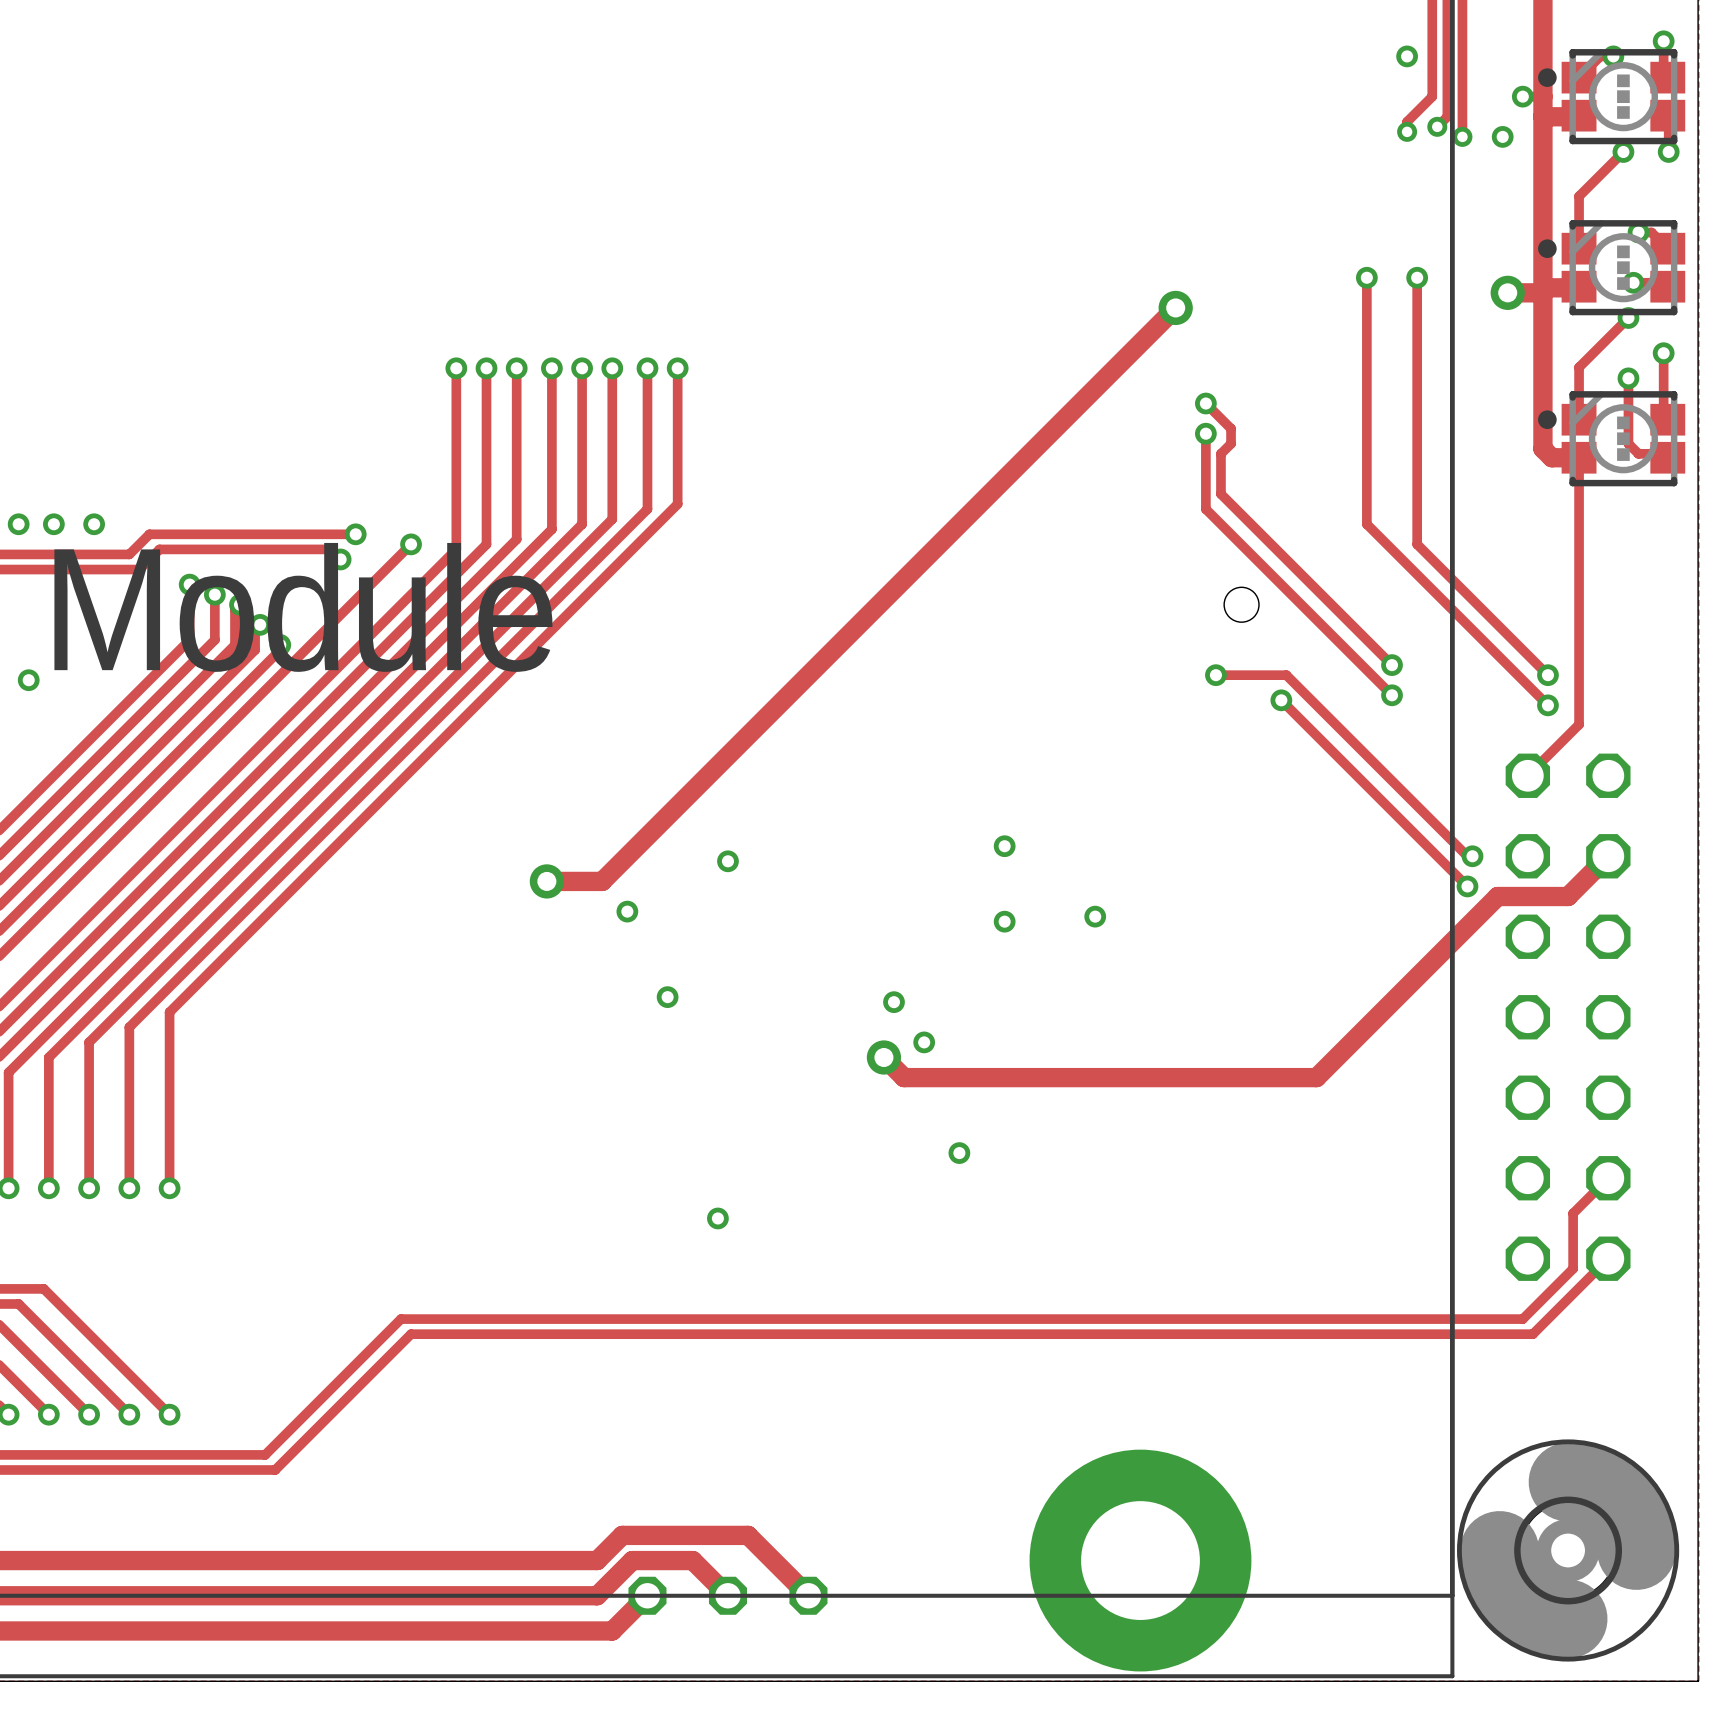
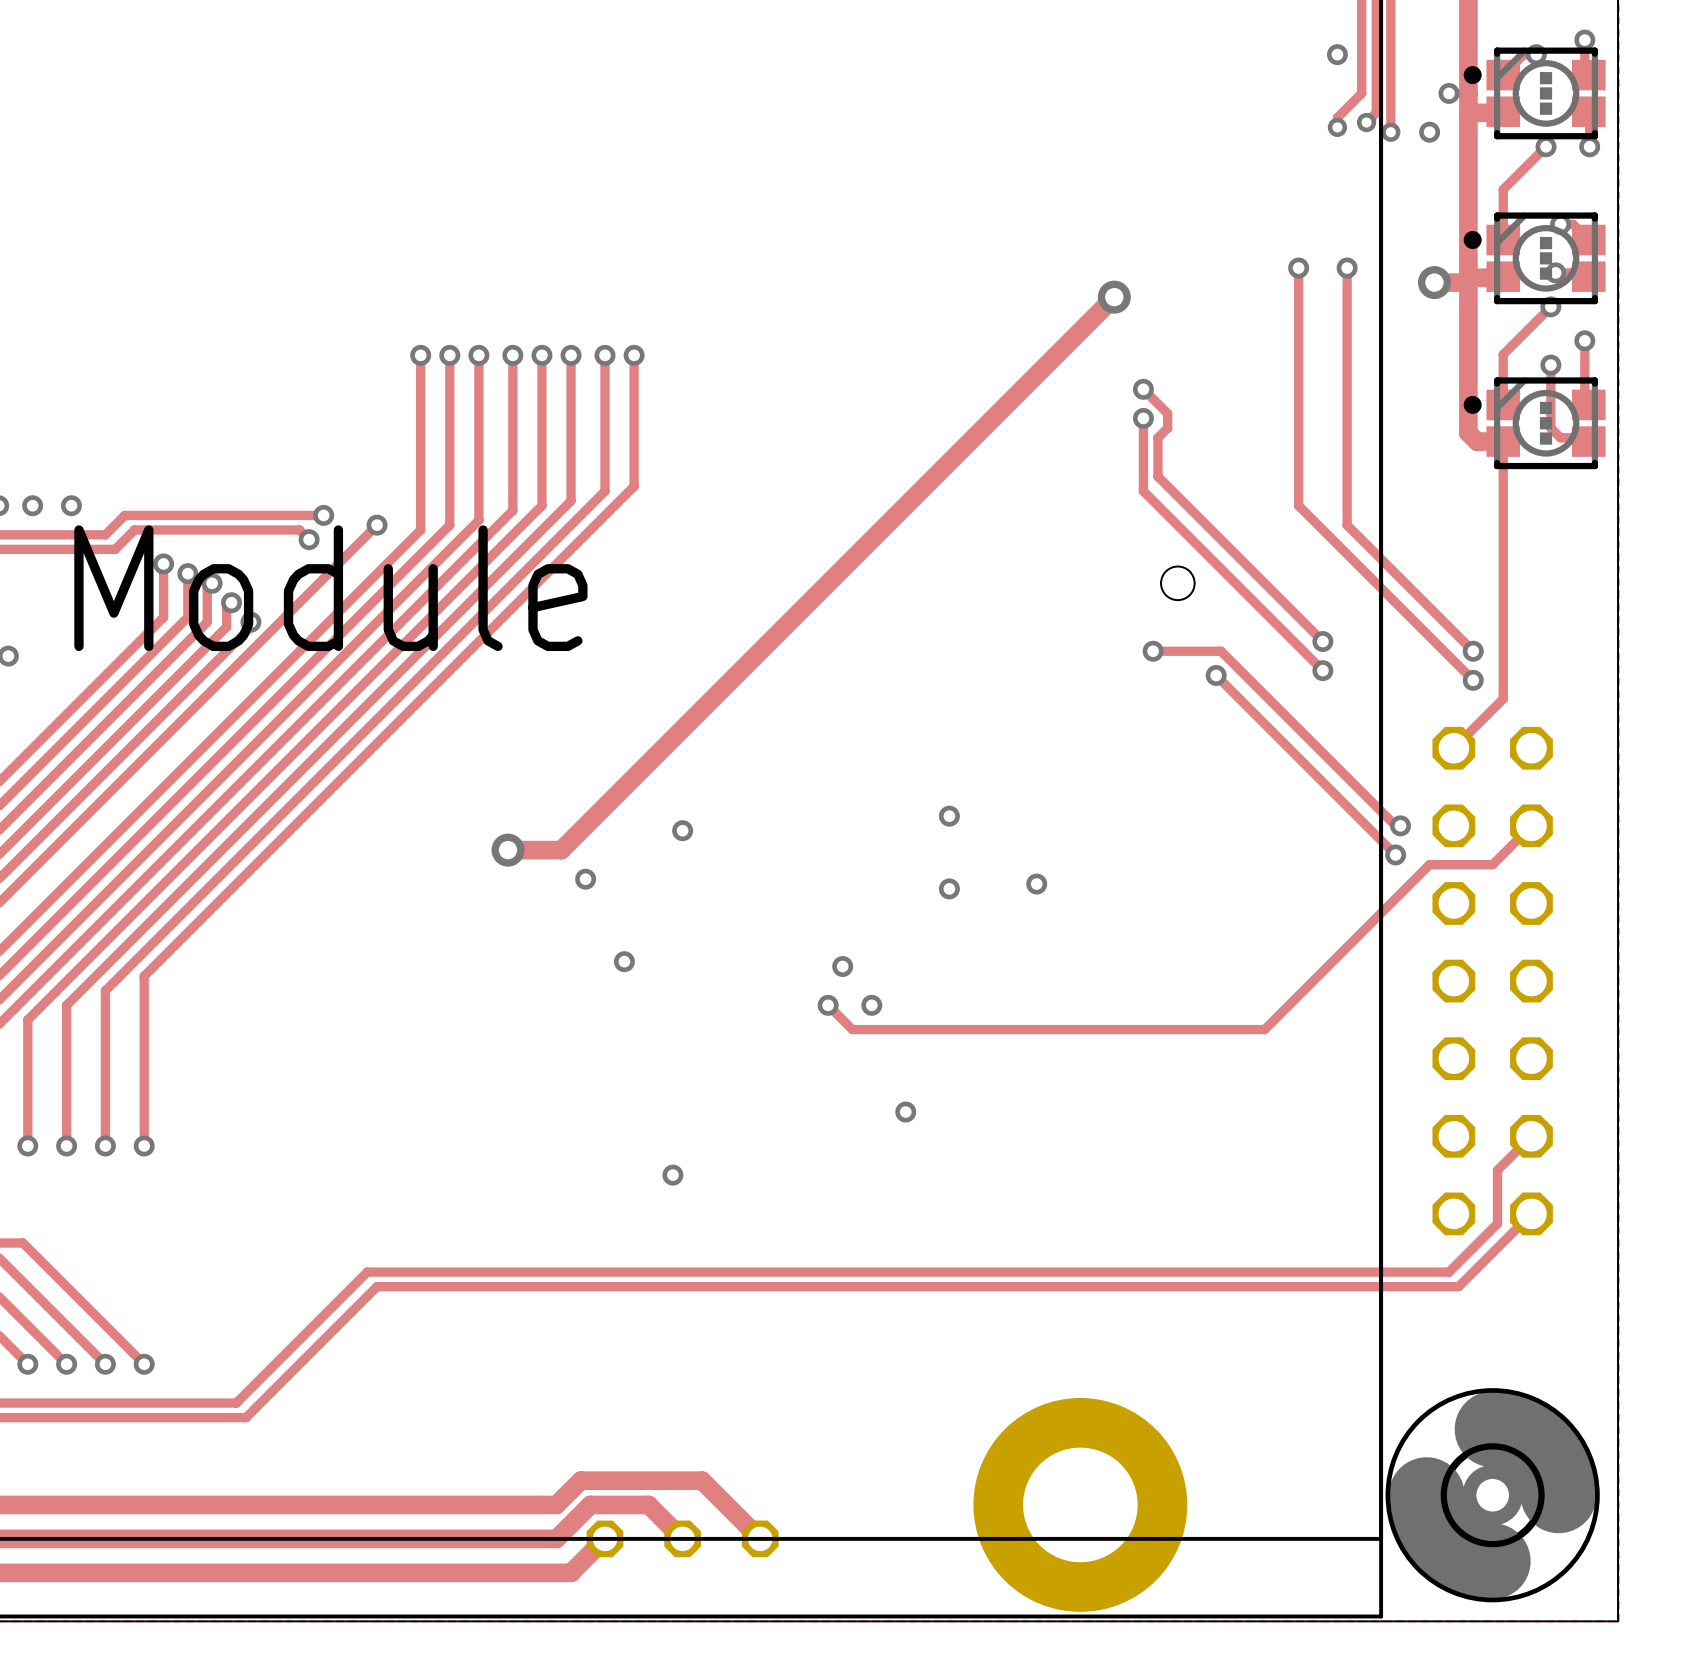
track width: thick (1608, 856) (1568, 896) (1502, 896) -> thin (1531, 825) (1492, 864) (1429, 864)
track: (1502, 896) (1497, 896) (1316, 1077) (904, 1077) (883, 1057) -> (1429, 864) (1264, 1029) (852, 1029) (828, 1005)
via size: [866, 1040, 902, 1075] -> [817, 994, 839, 1016]

